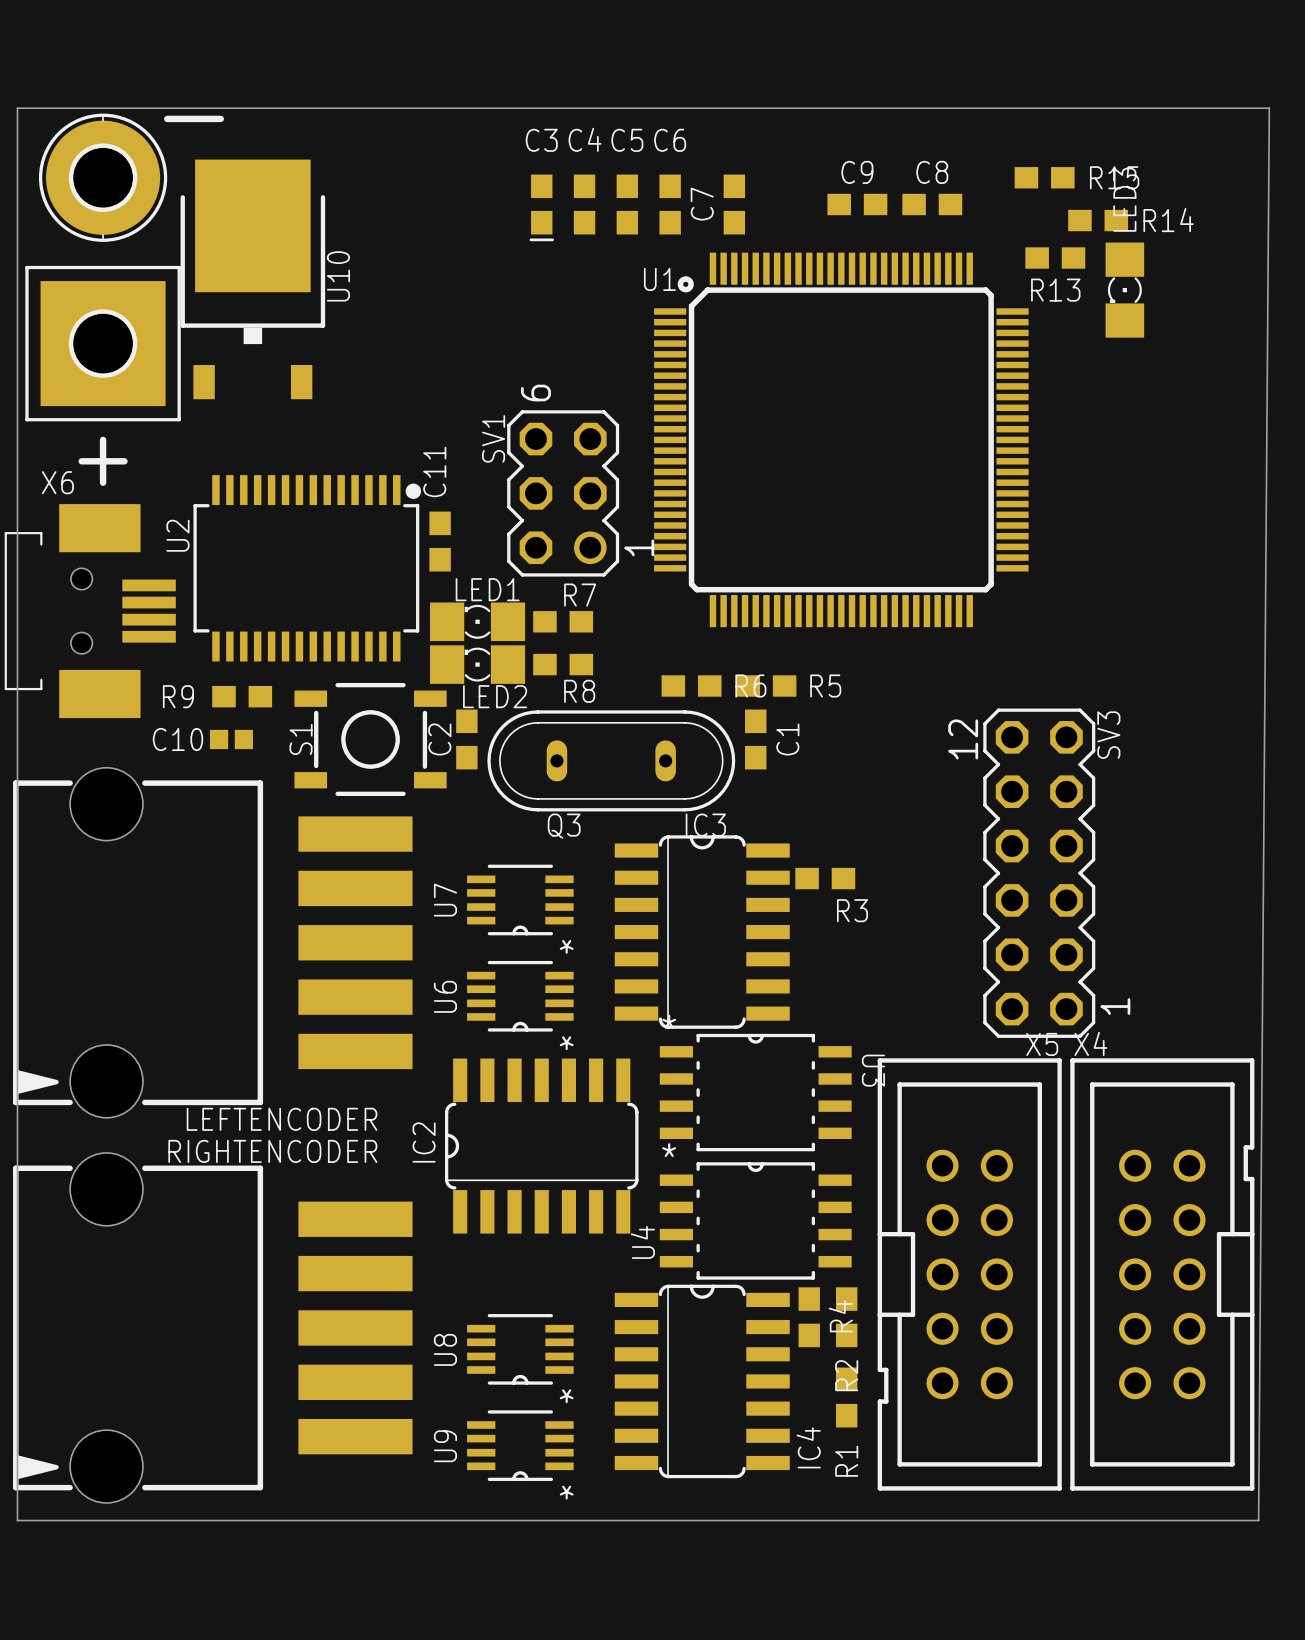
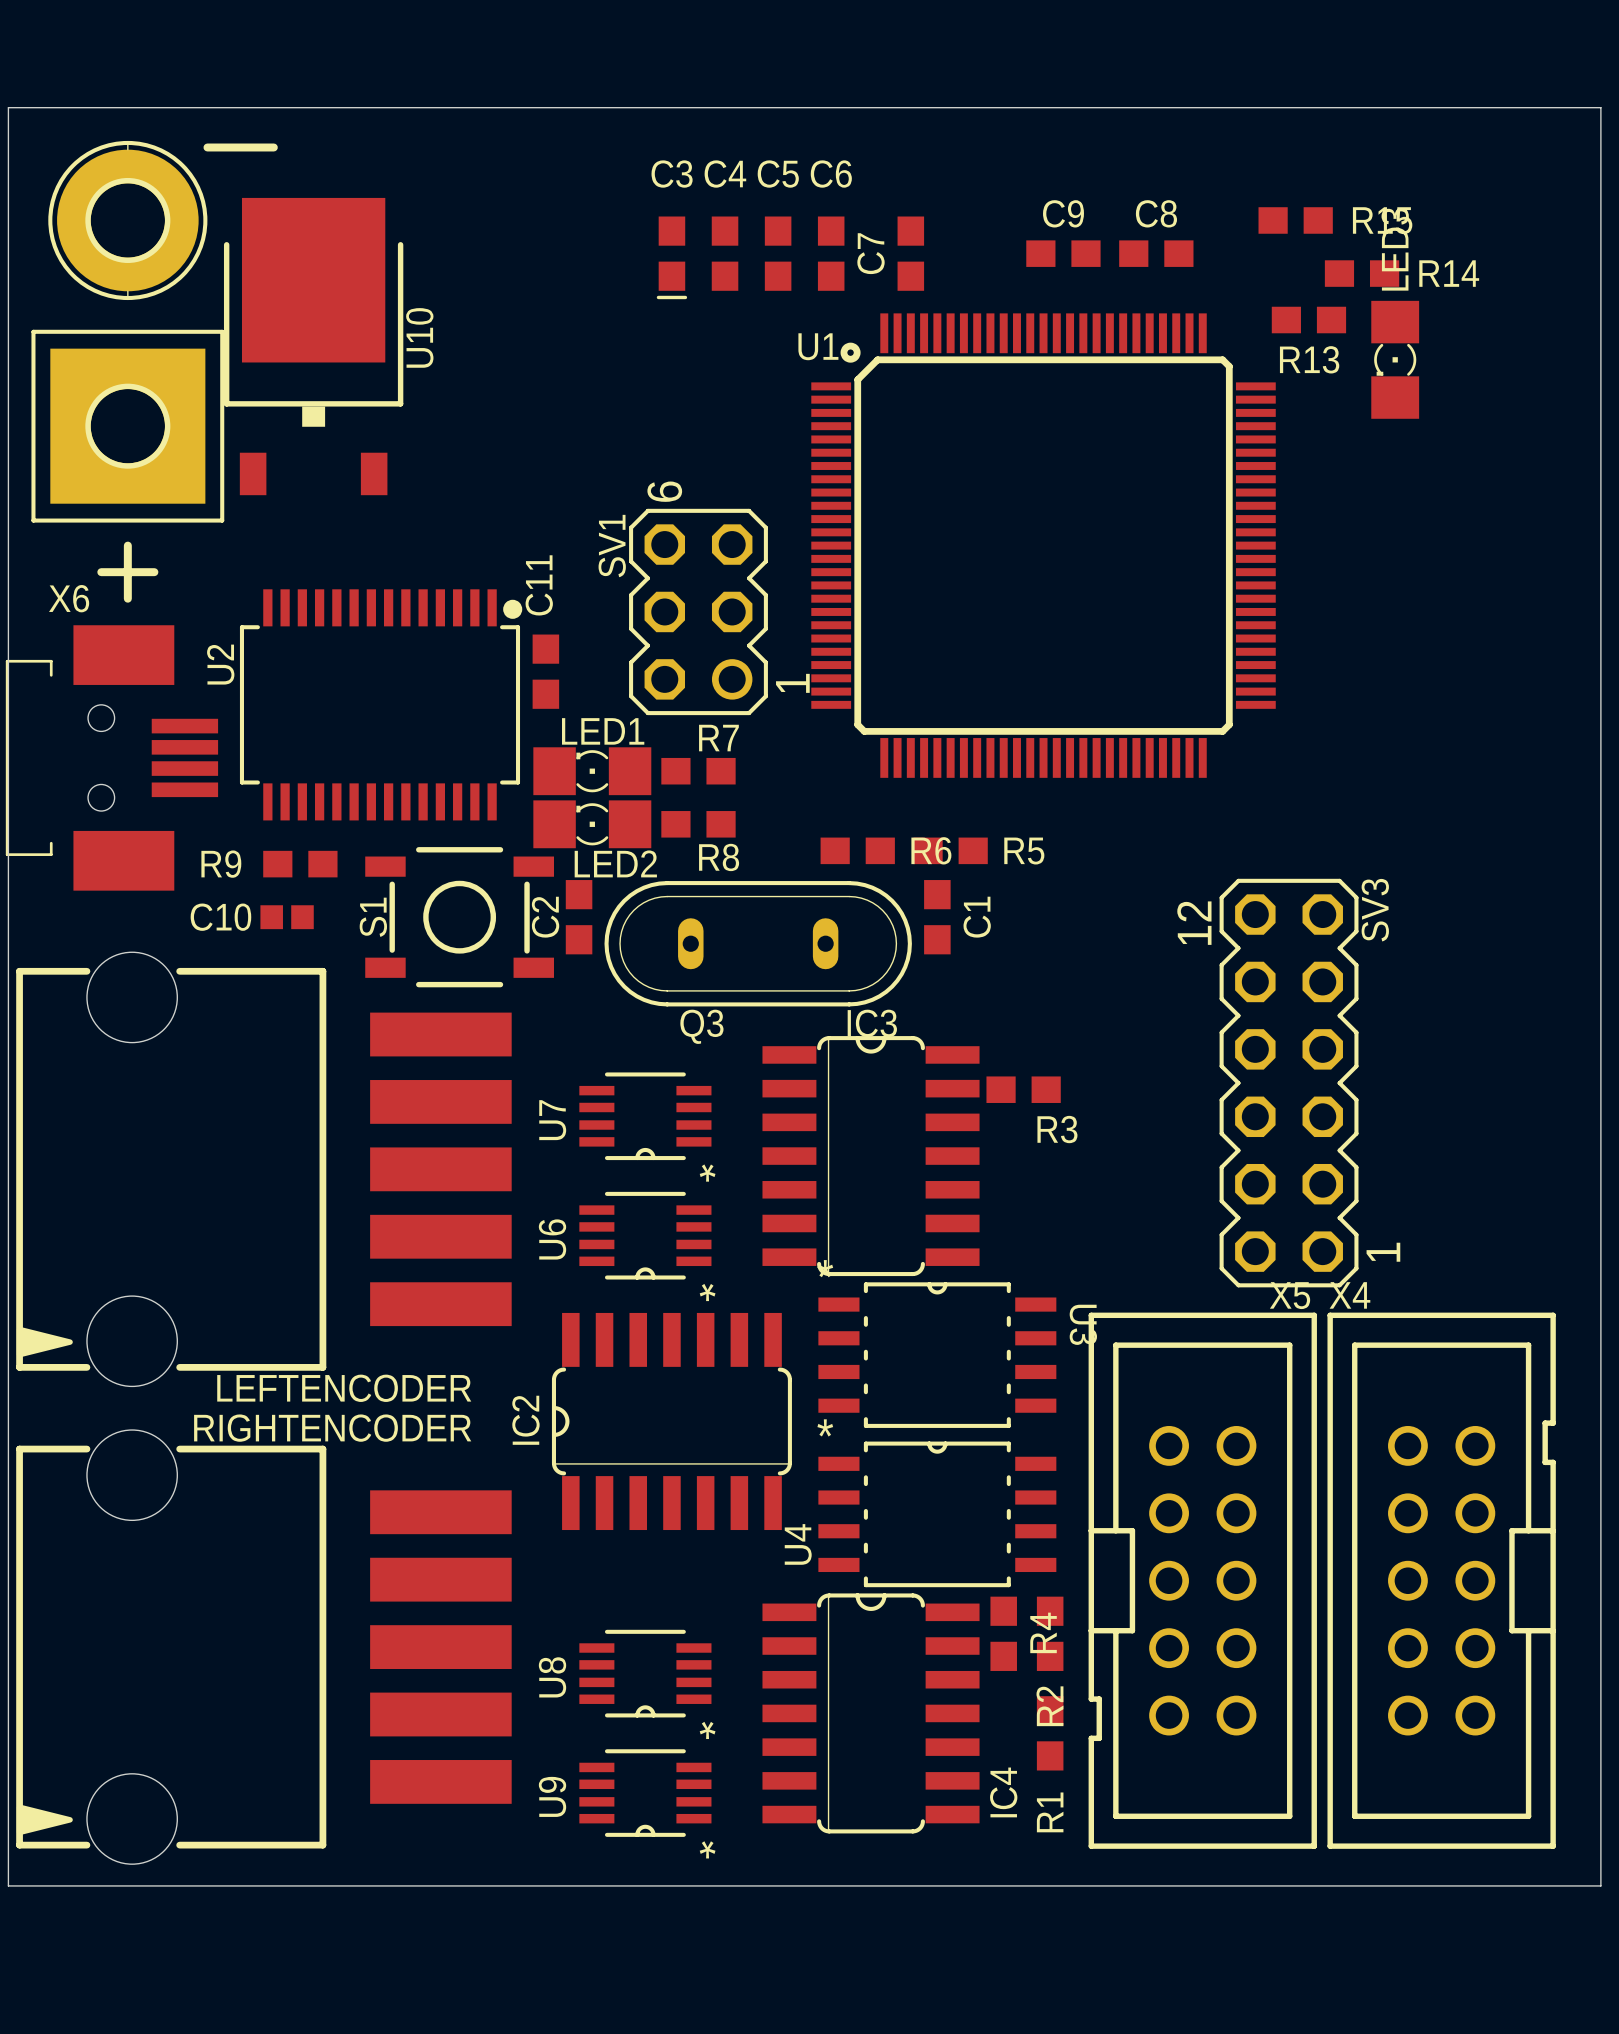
board edge: (17, 1520) (17, 108) (1269, 108) (1258, 1520) -> (21, 1885) (8, 1885) (8, 107) (1600, 107) (1600, 1885) (1561, 1885)

